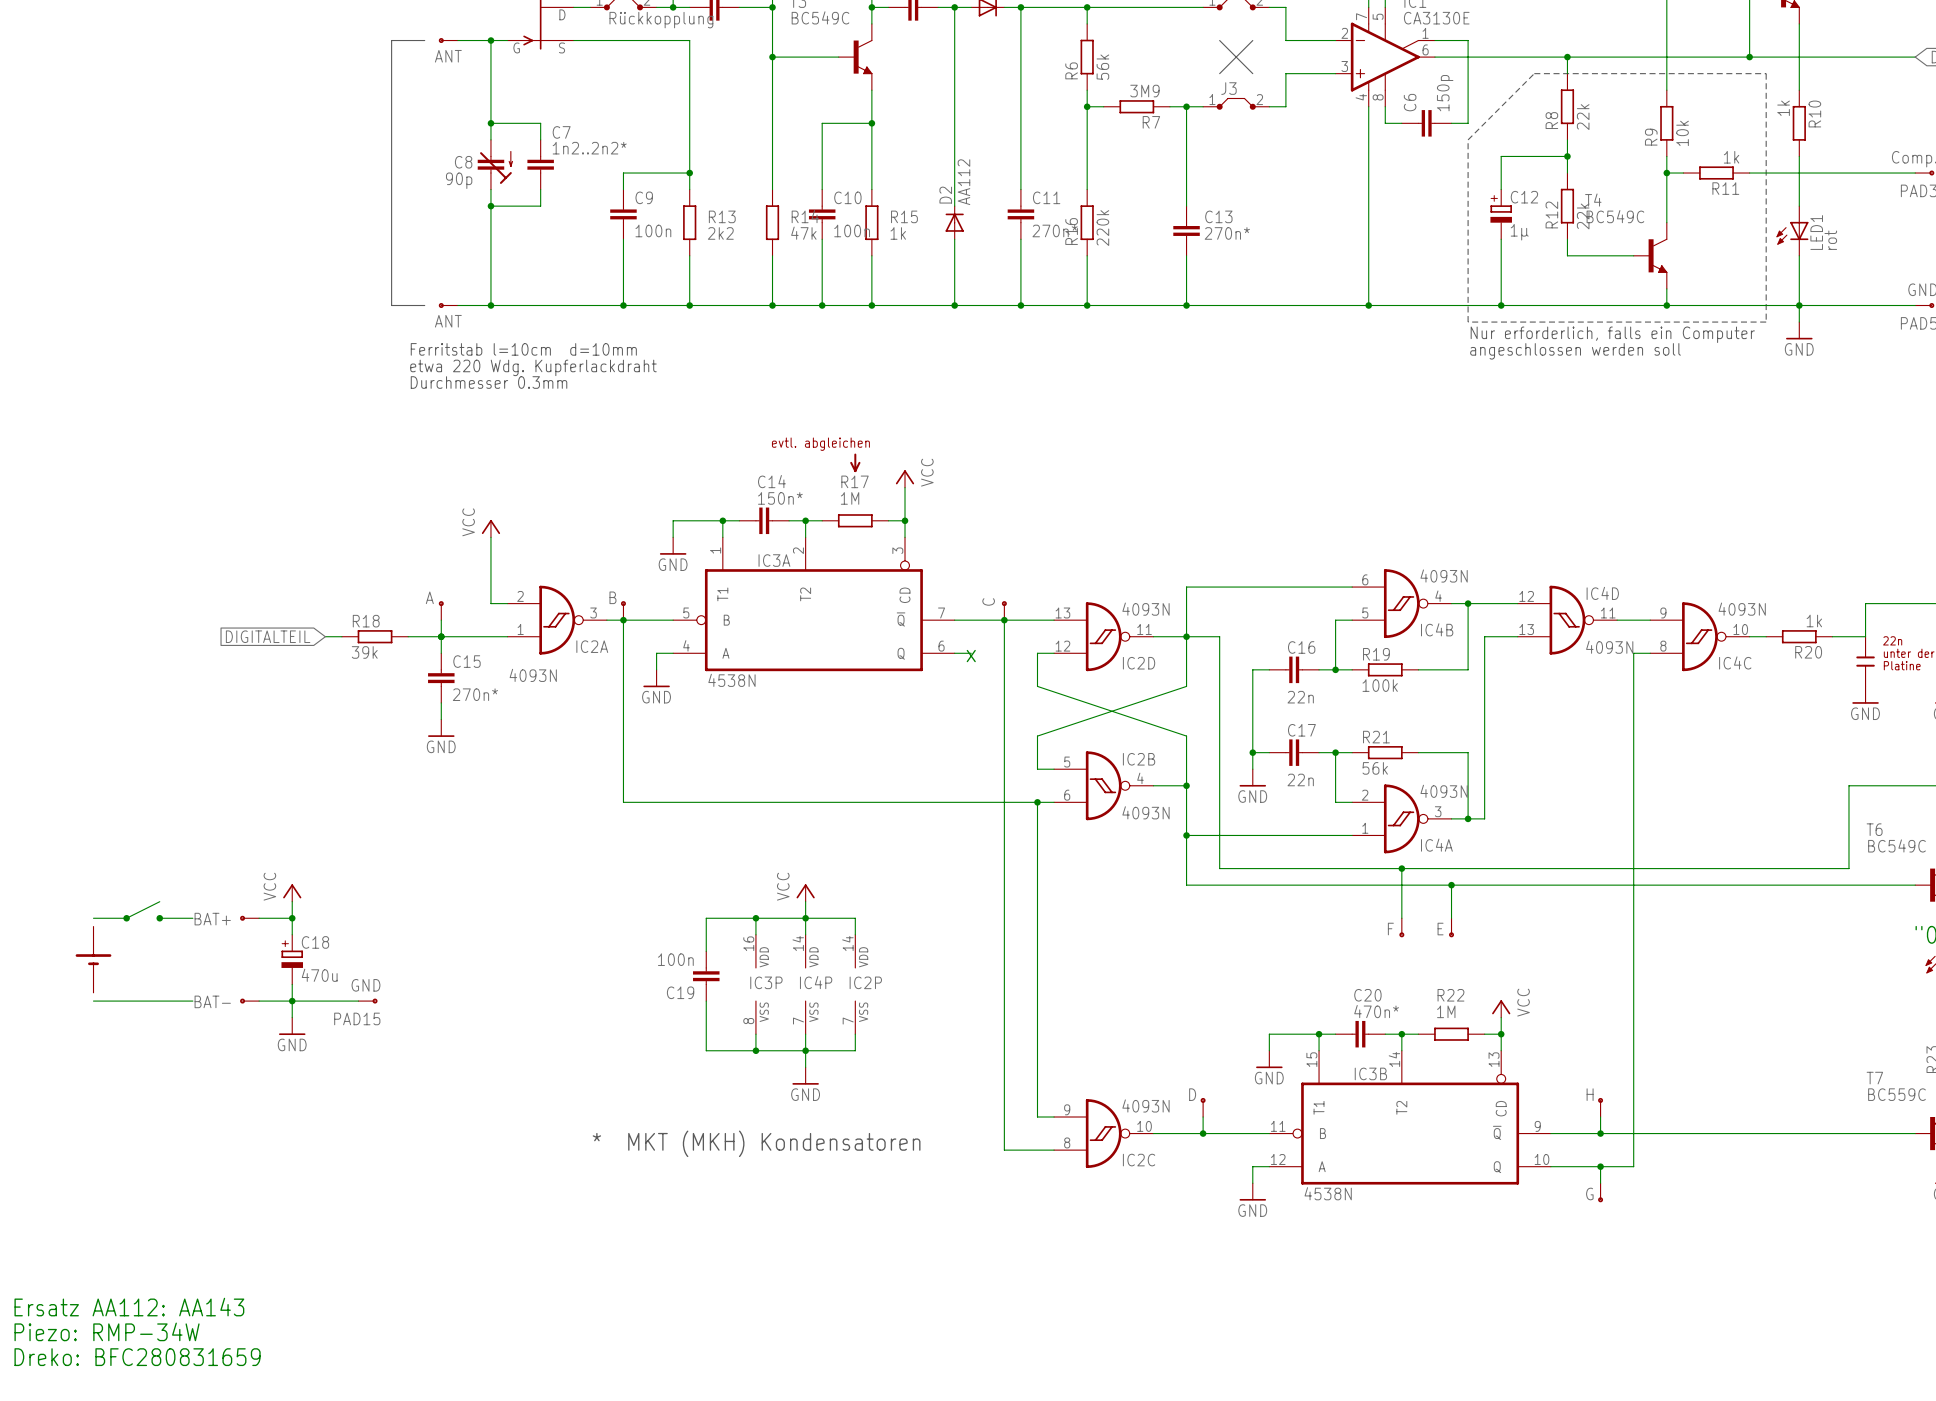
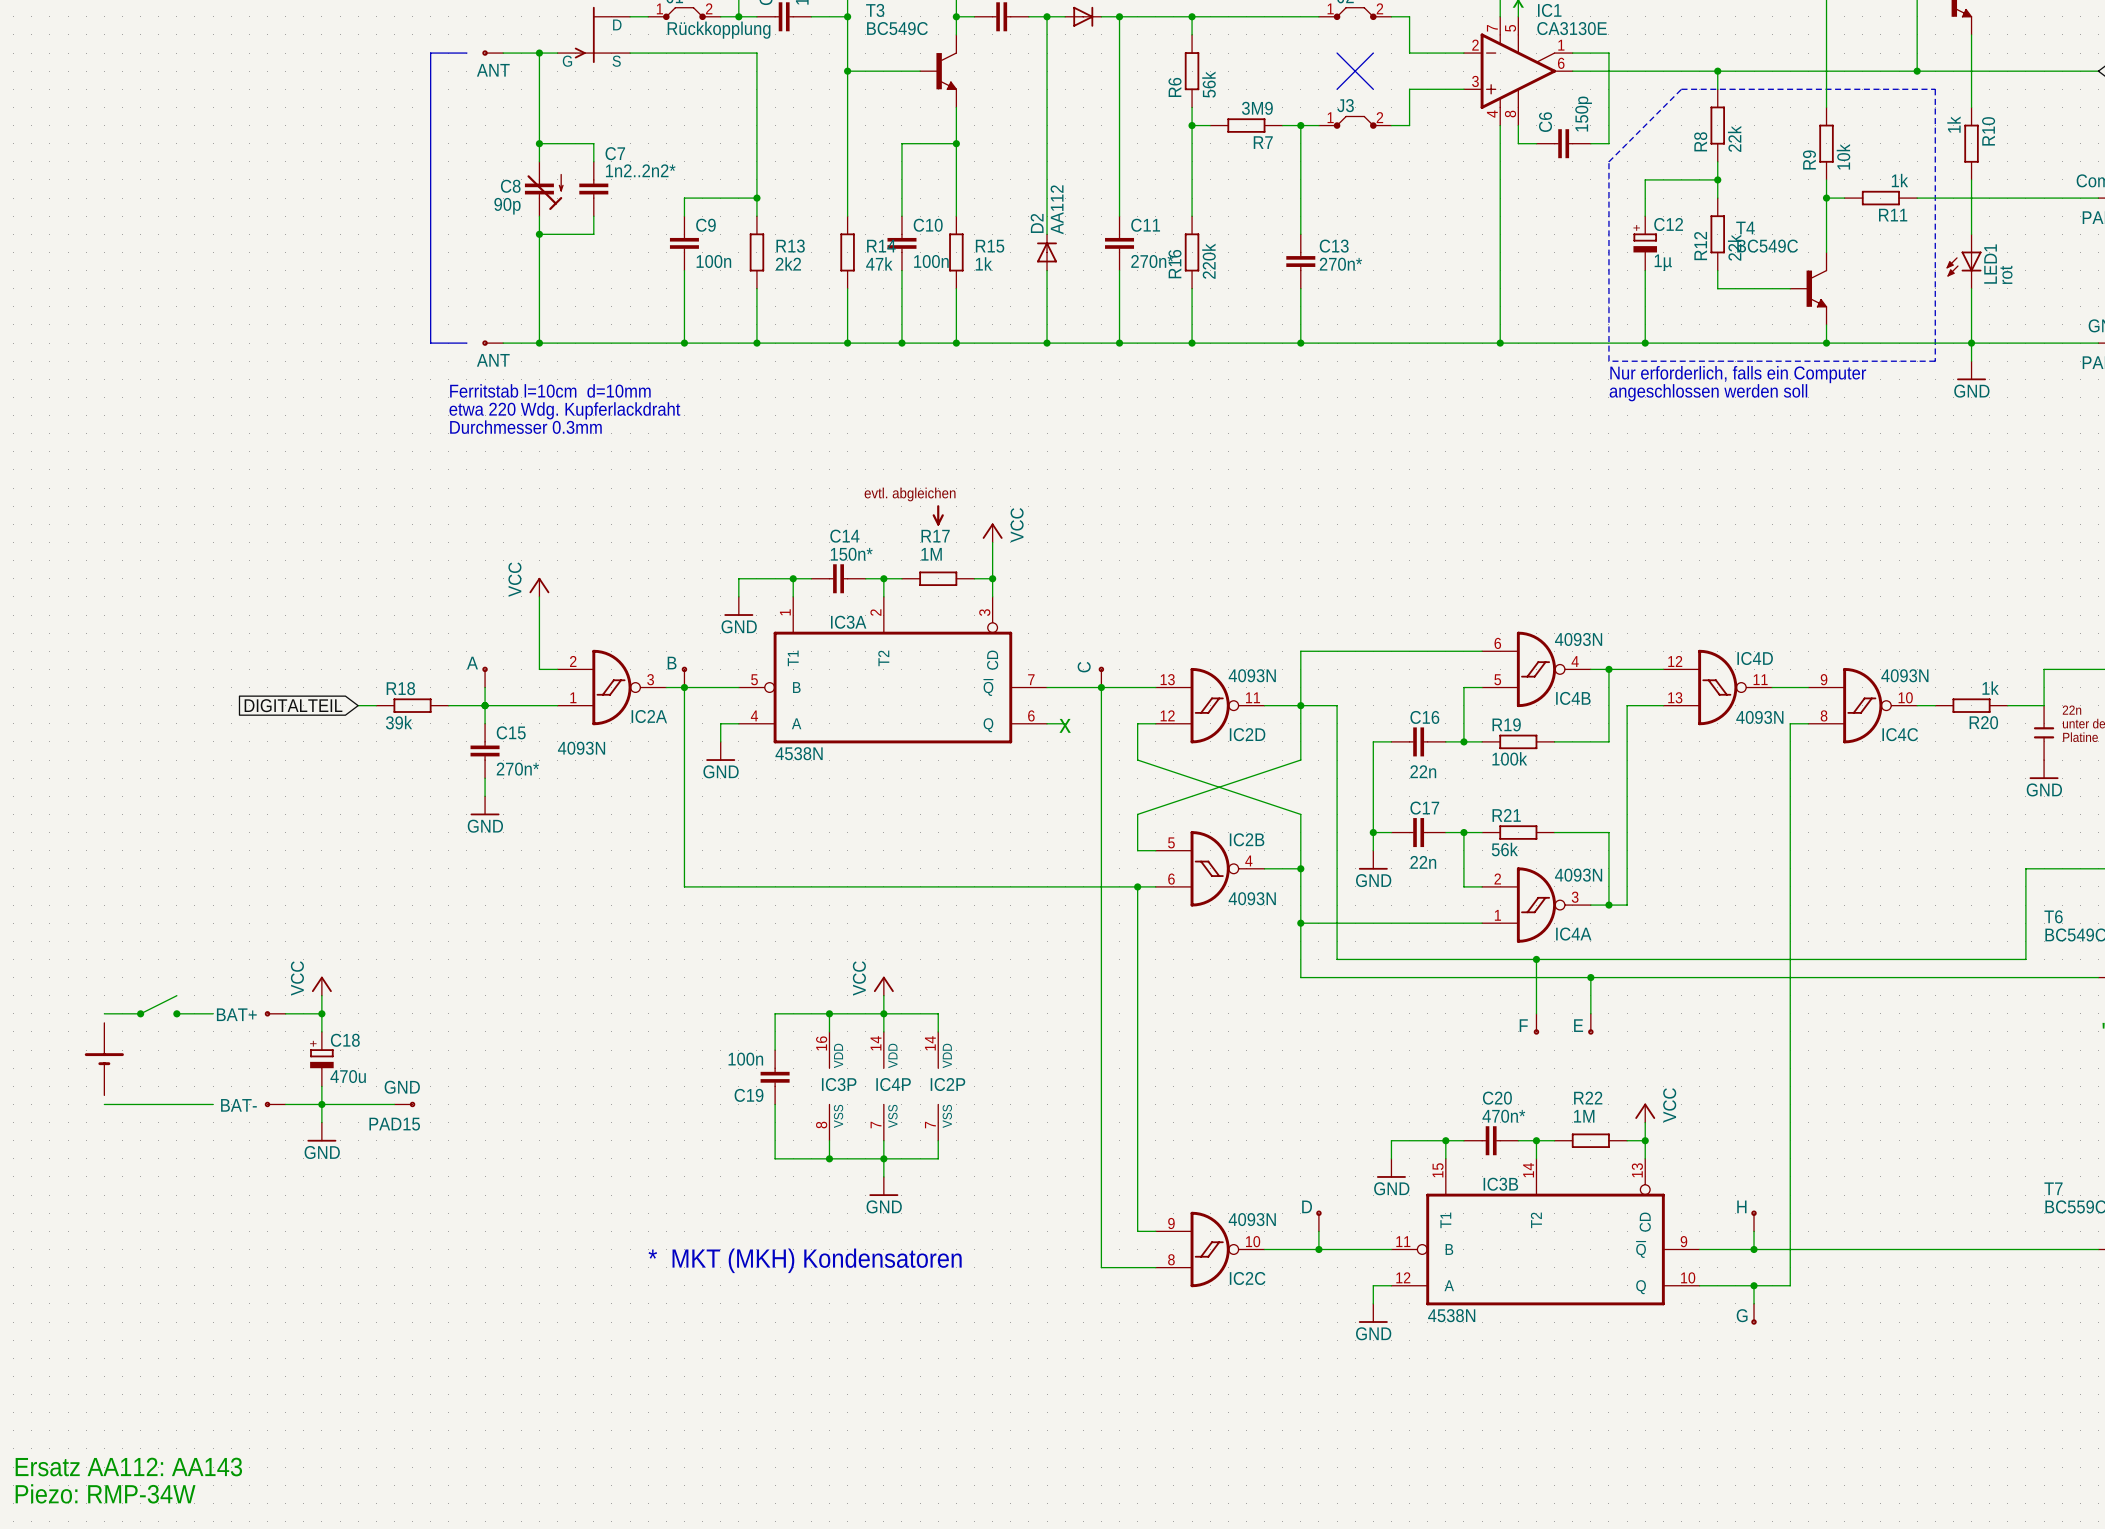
text: Ersatz AA112: AA143 (129, 1307) -> none
text: Piezo: RMP-34W (107, 1331) -> Ersatz AA112: AA143 (128, 1467)
text: Dreko: BFC280831659 (137, 1357) -> Piezo: RMP-34W (105, 1493)

